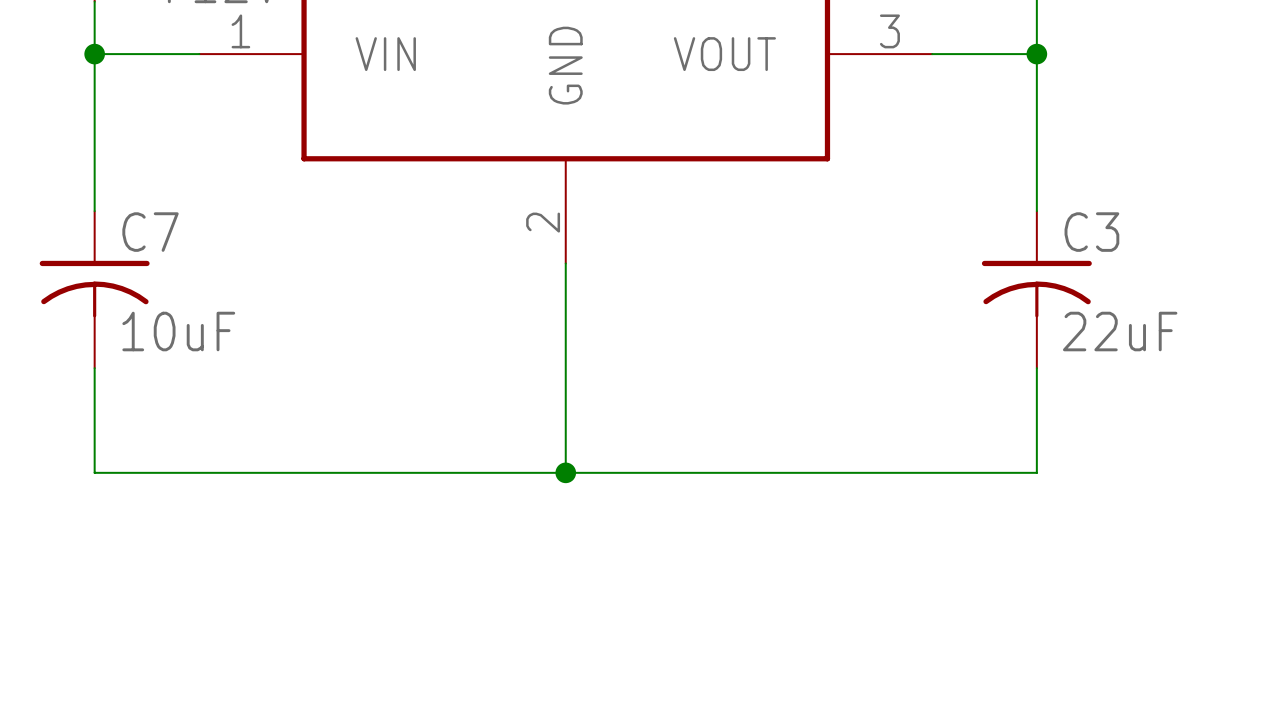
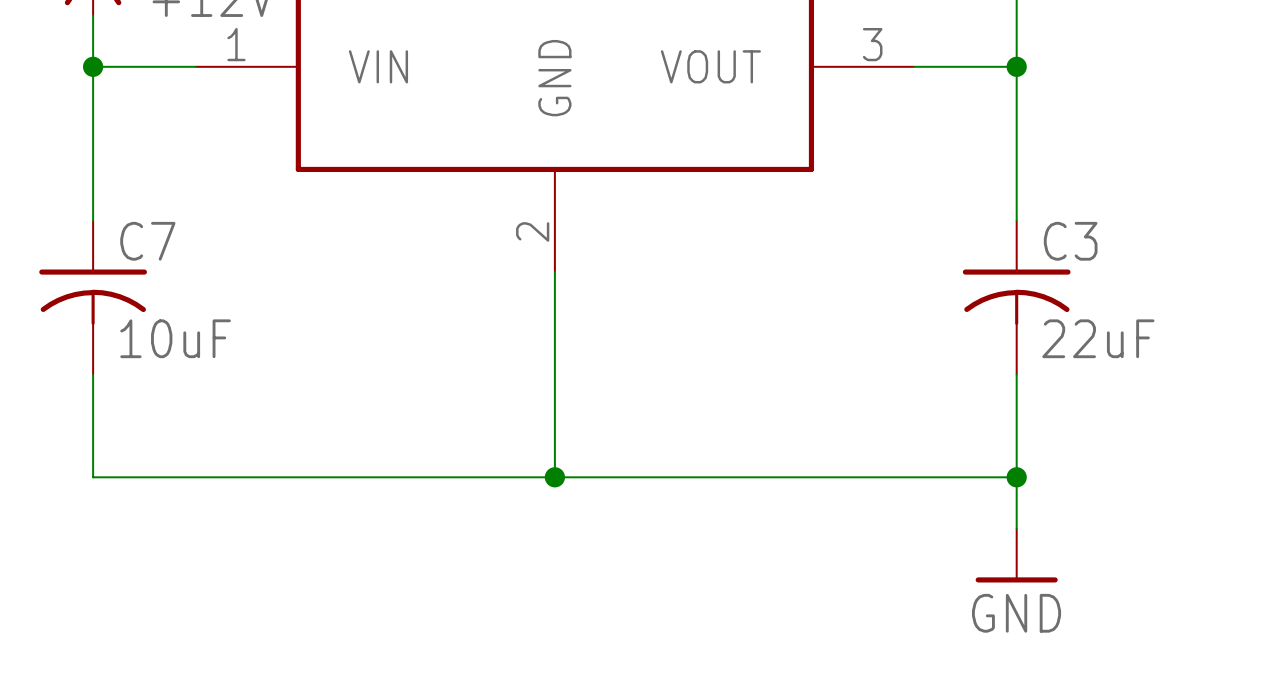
wire: none -> (1016, 477) (1016, 528)
junction: none -> (1016, 477)
power symbol: none -> GND (1016, 555)

